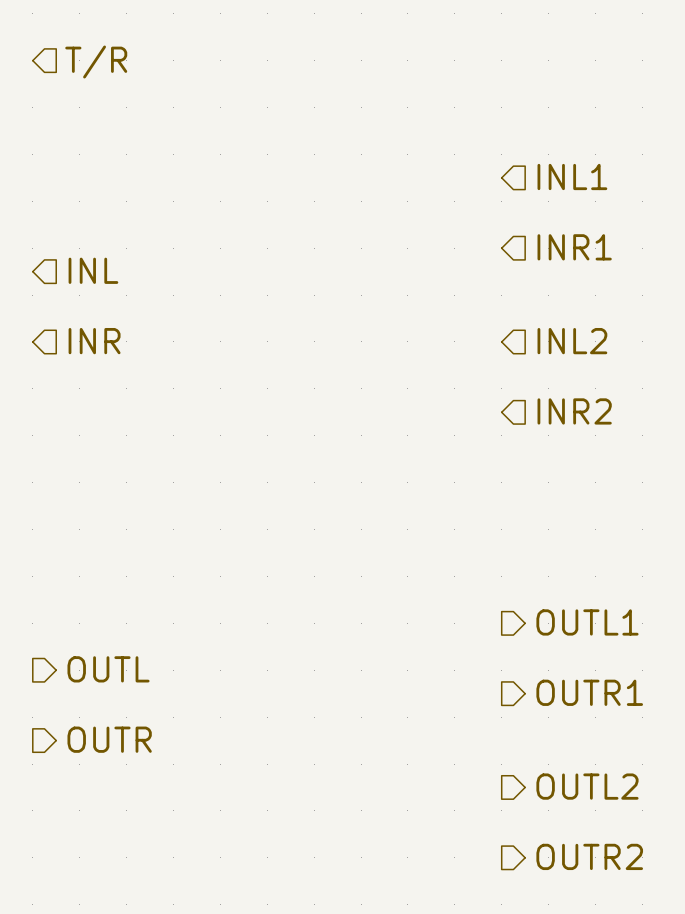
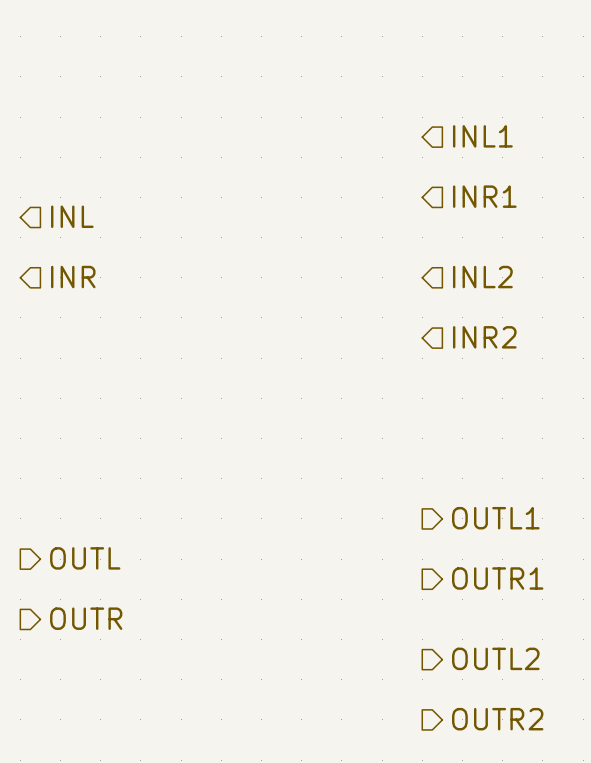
hierarchical label: T/R (96, 62) -> none

